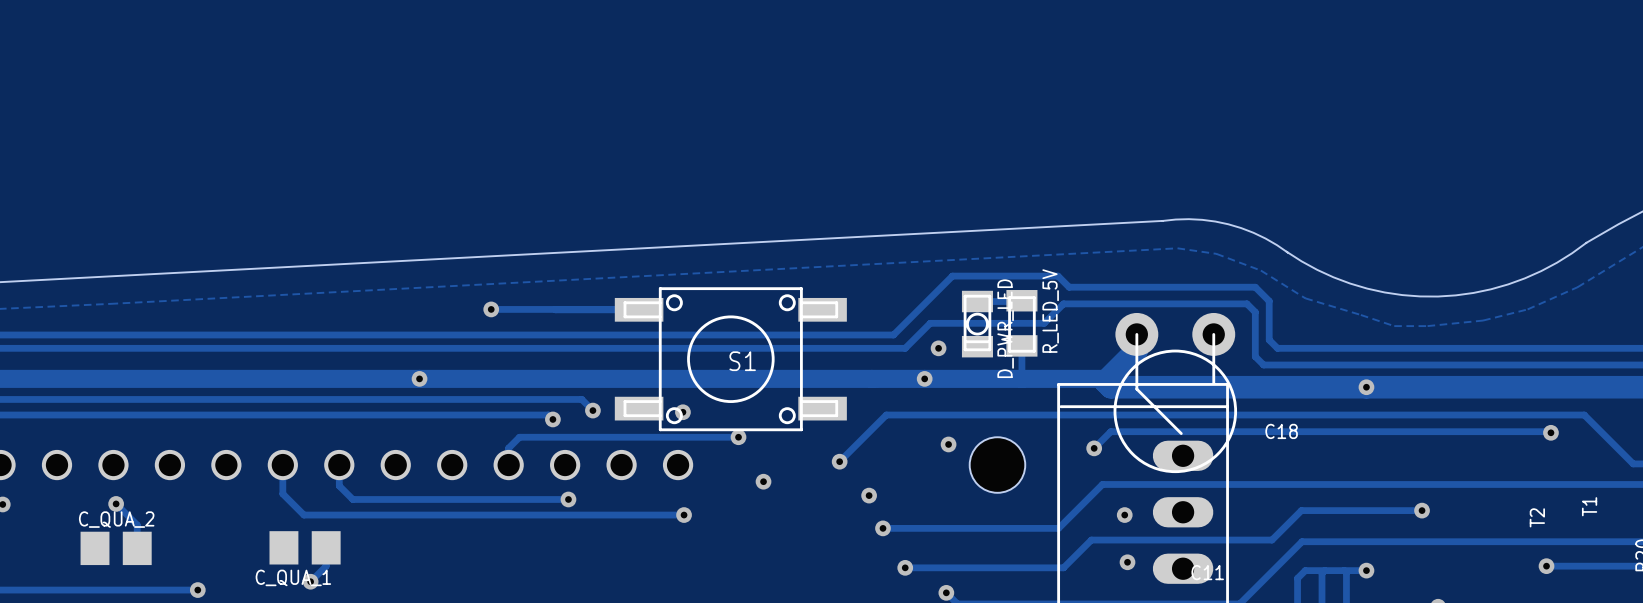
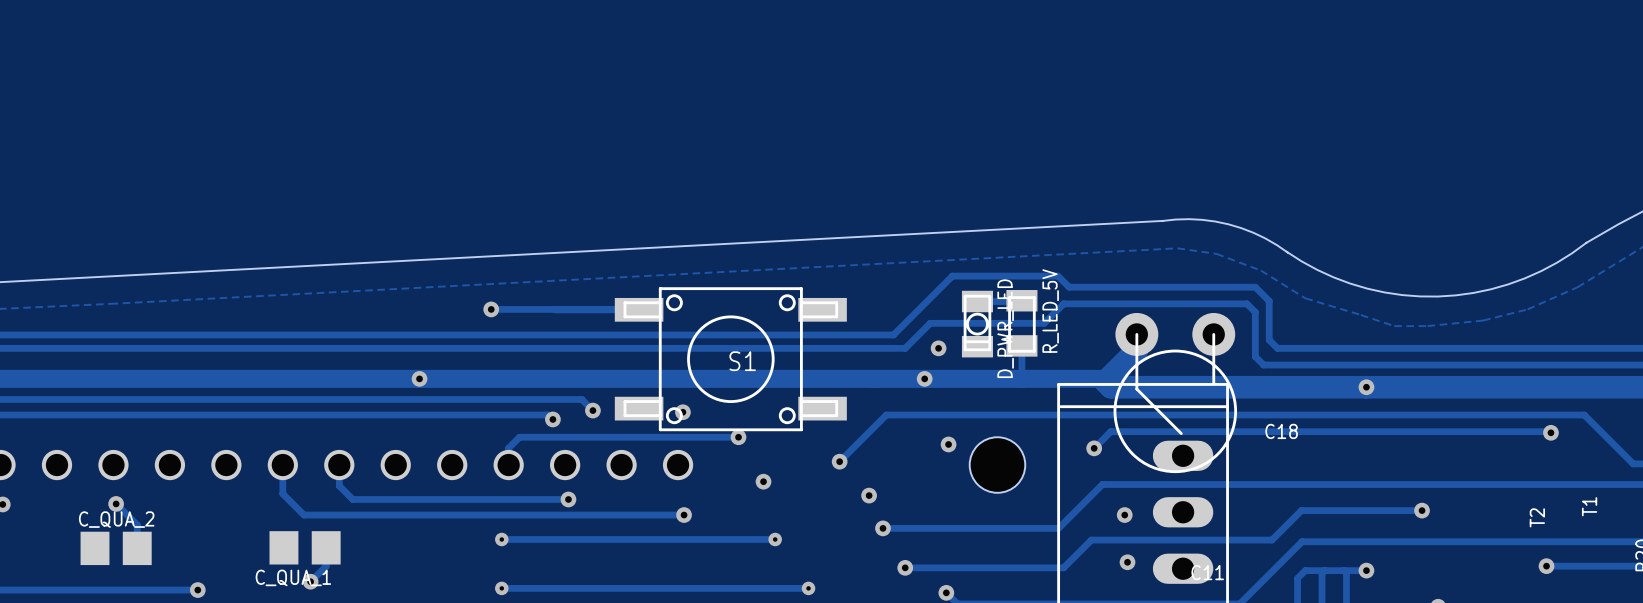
track: none -> (501, 539) (775, 539)
via: none -> (501, 539)
via: none -> (775, 539)
track: none -> (501, 588) (808, 588)
via: none -> (501, 588)
via: none -> (808, 588)

